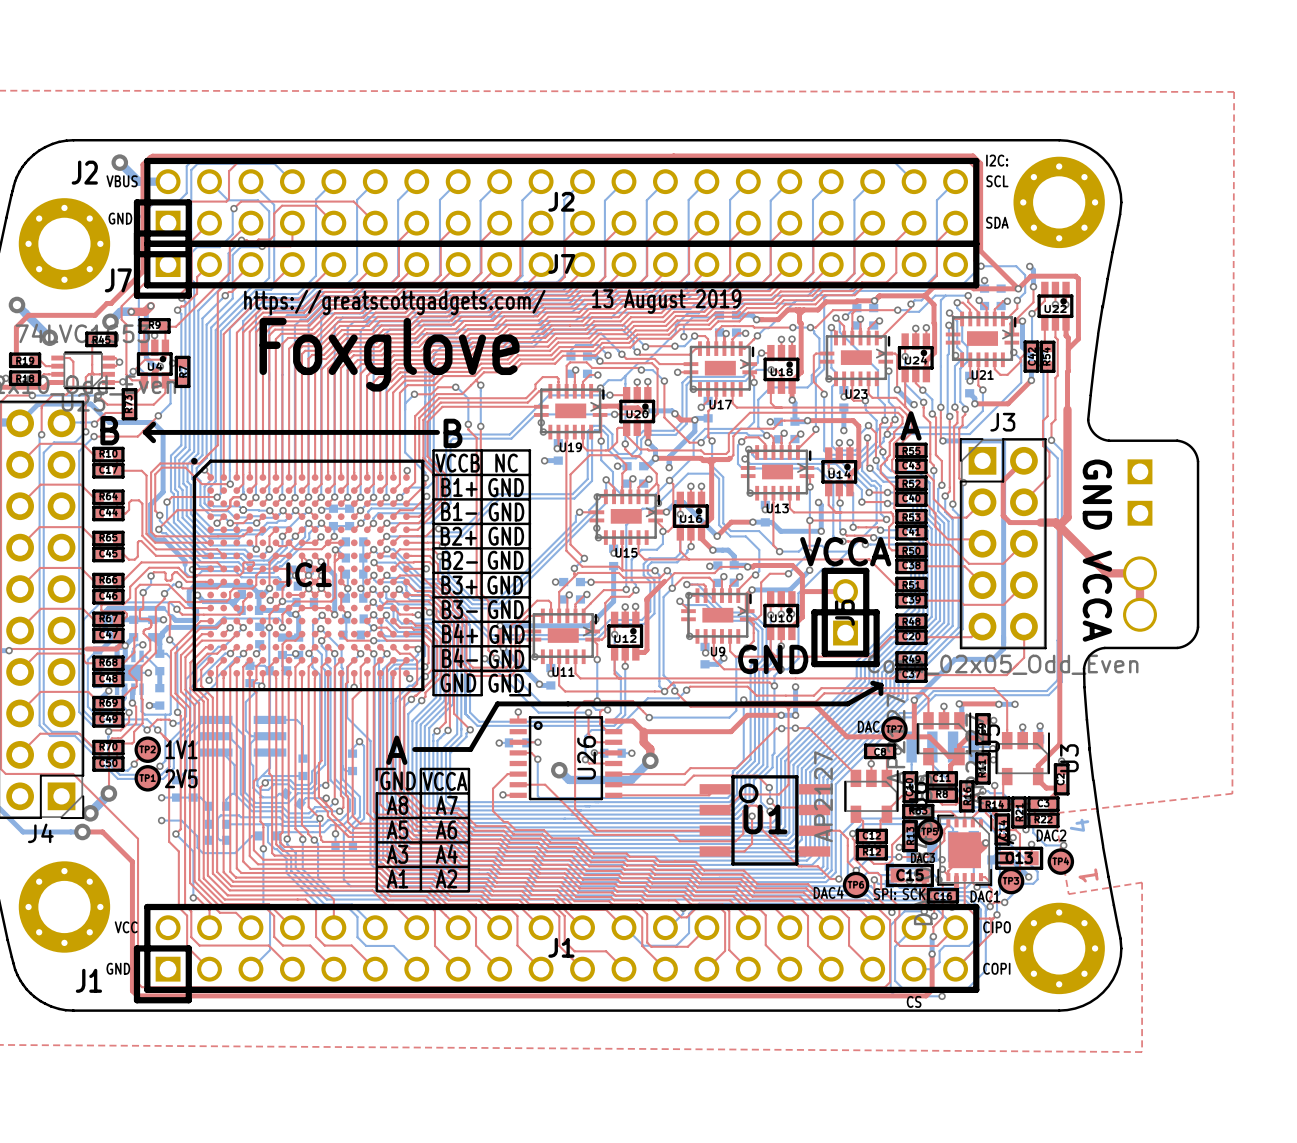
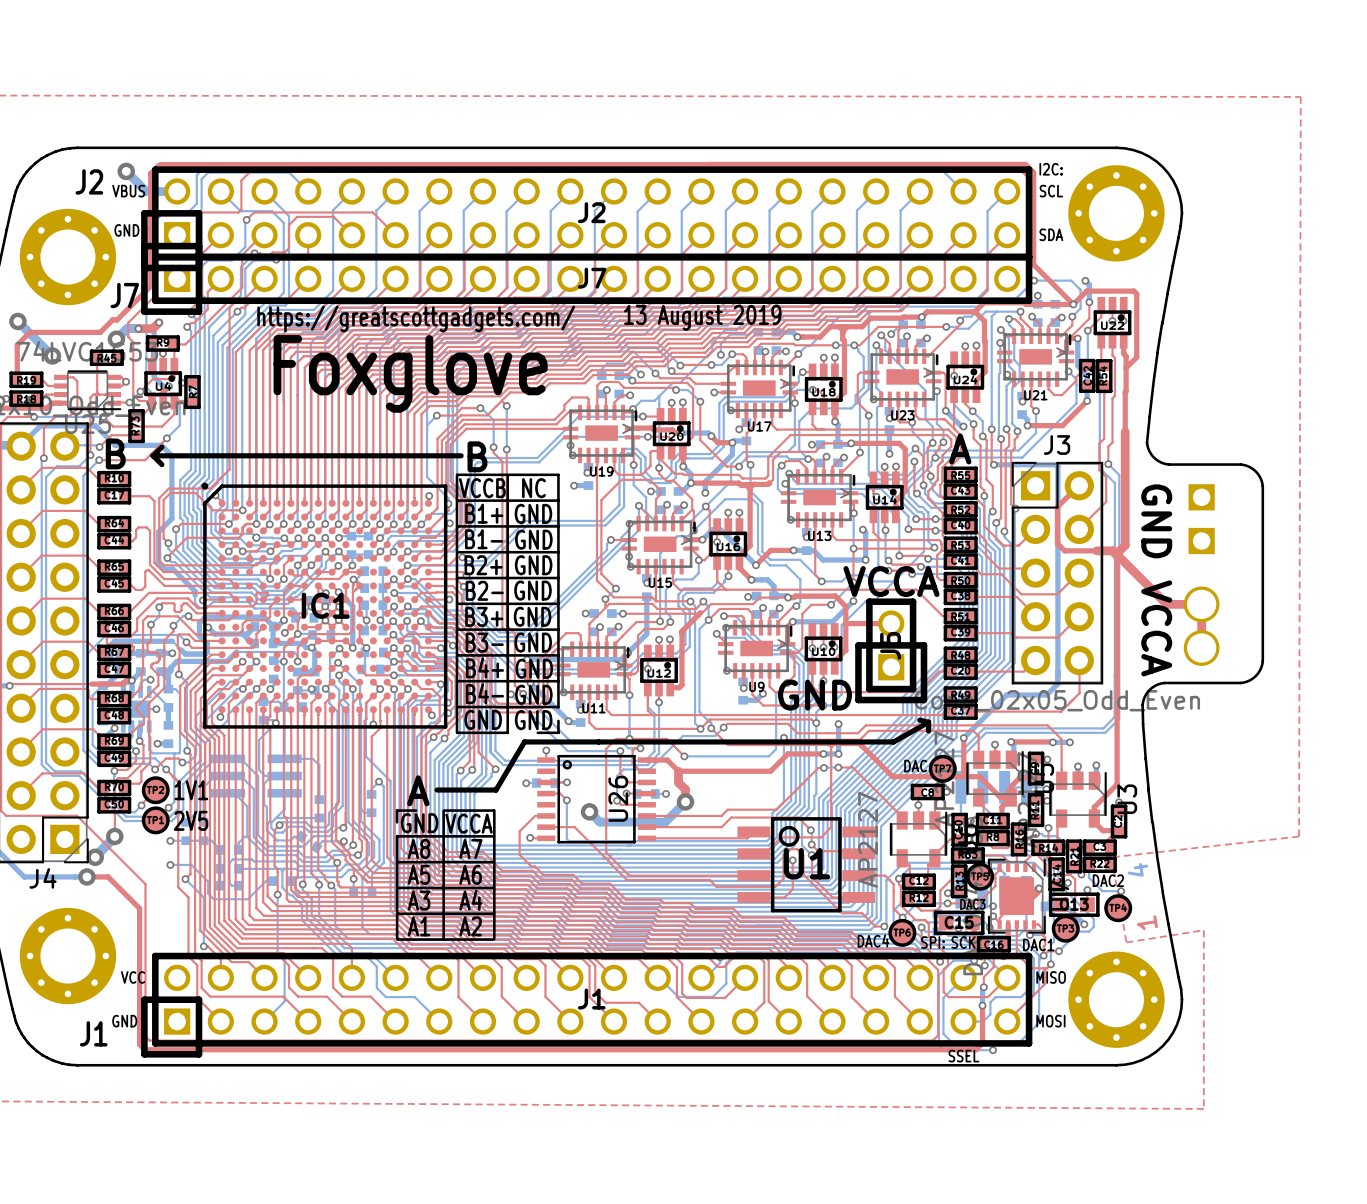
text: CIPO (997, 927) -> MISO (1051, 977)
text: COPI (996, 968) -> MOSI (1050, 1021)
text: CS (914, 1001) -> SSEL (963, 1056)

